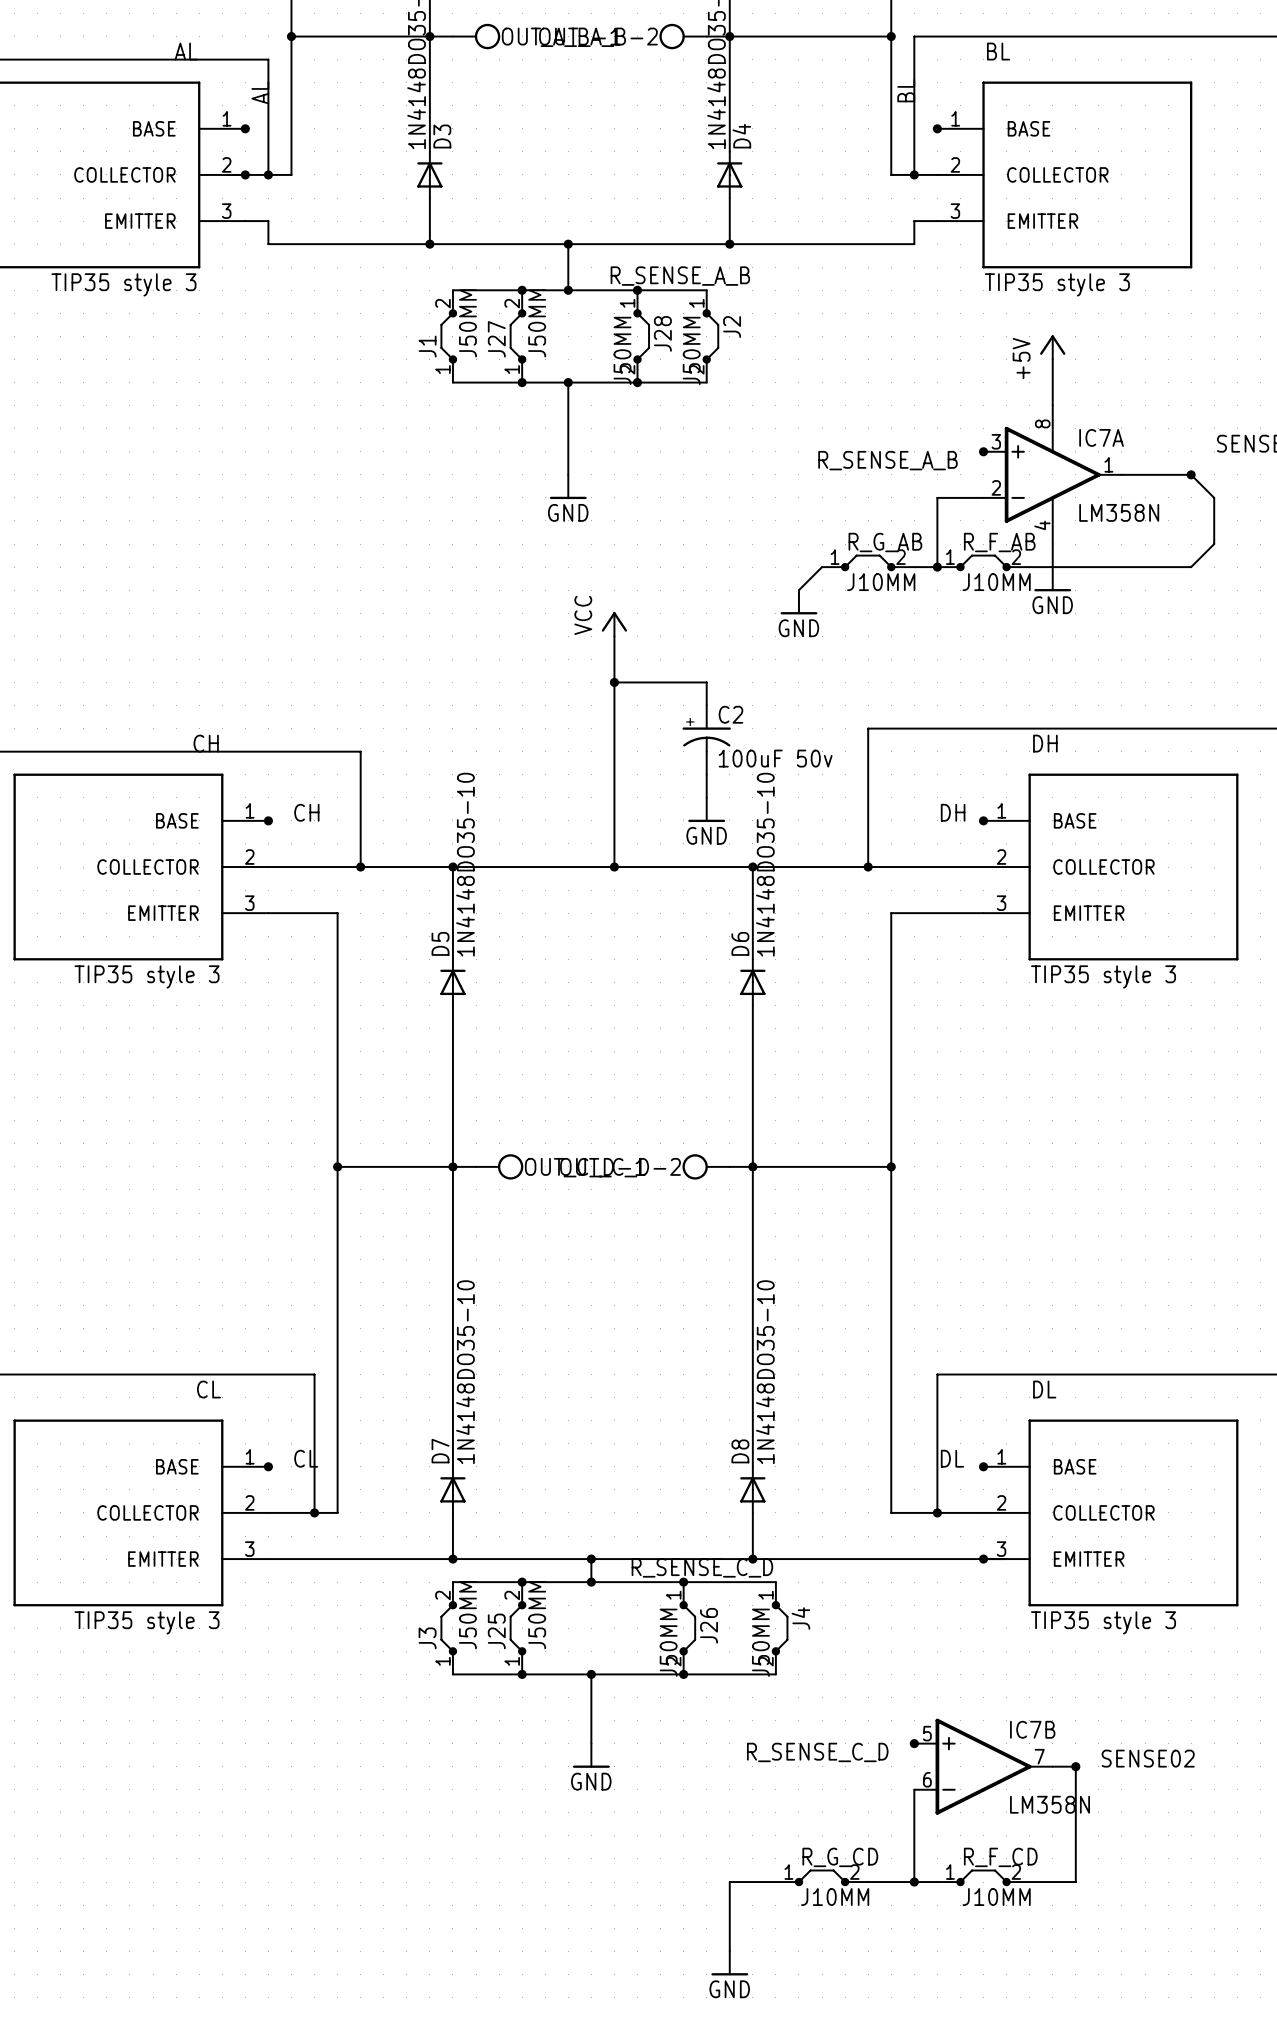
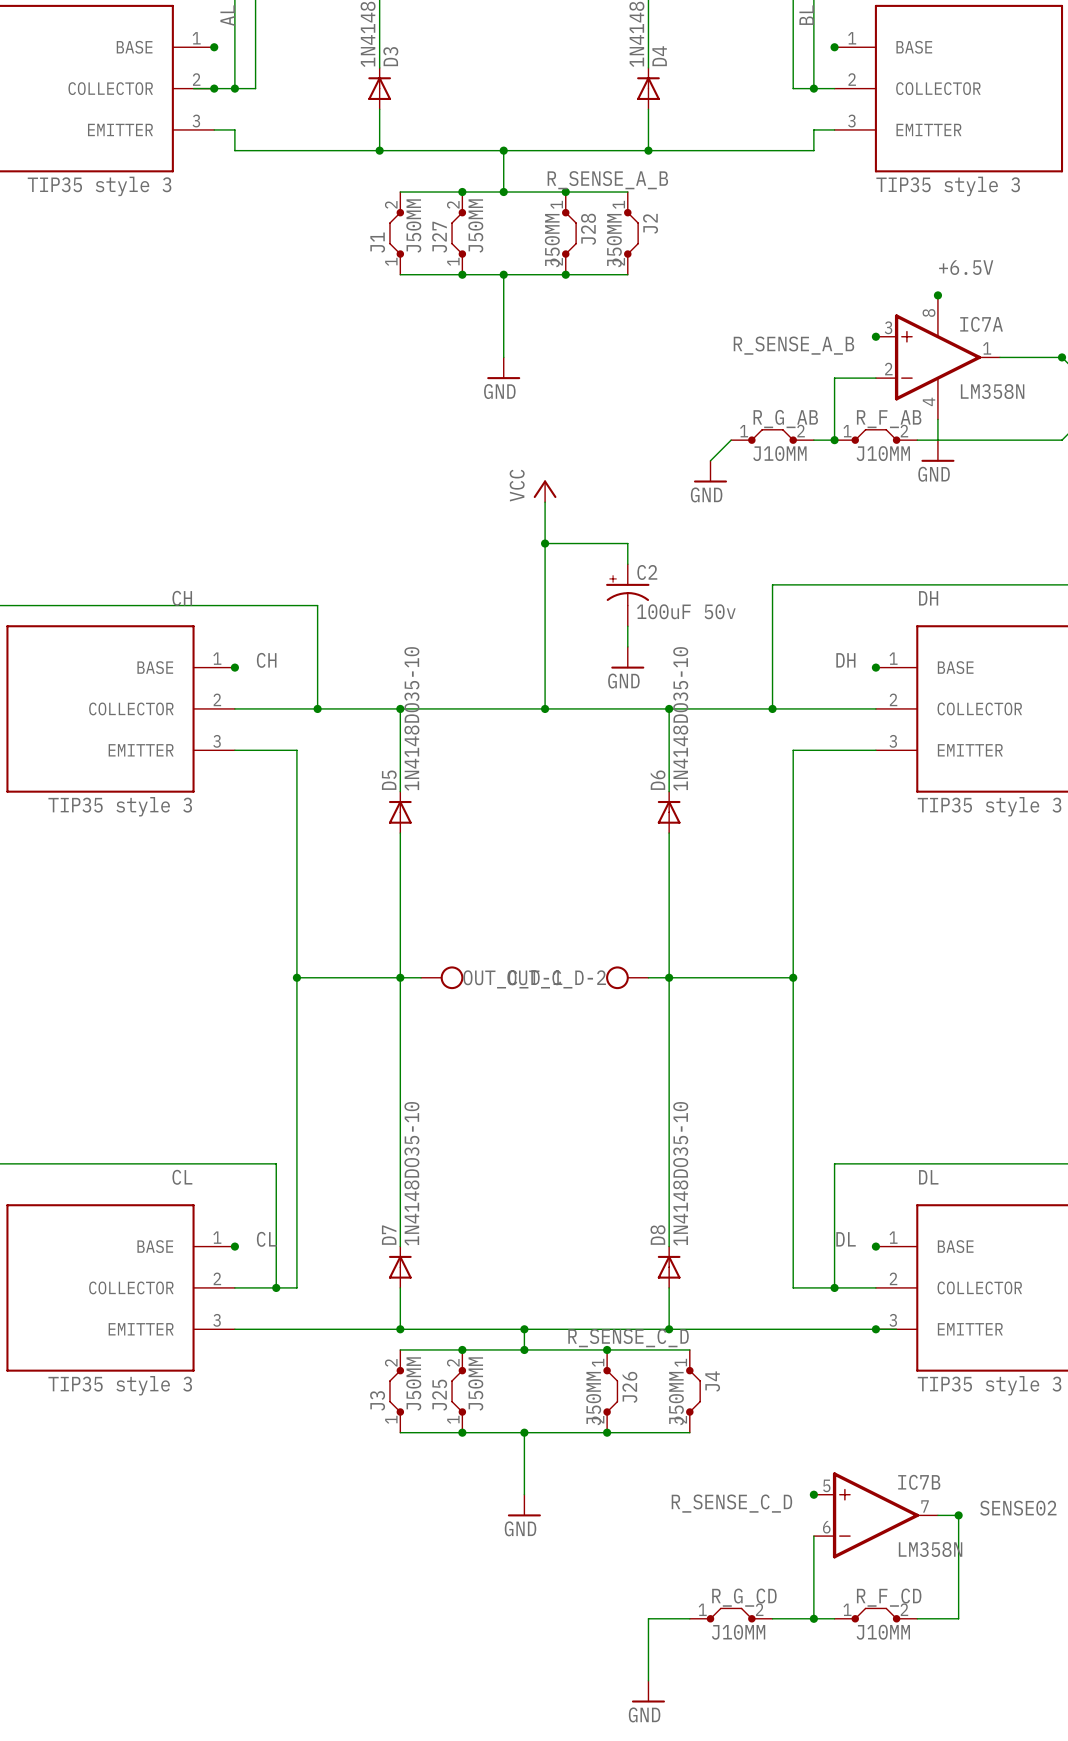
power symbol: +5V (1052, 347) -> none
wire: (1052, 359) (1052, 405) -> none
label: none -> +6.5V (966, 267)
junction: none -> (937, 295)

